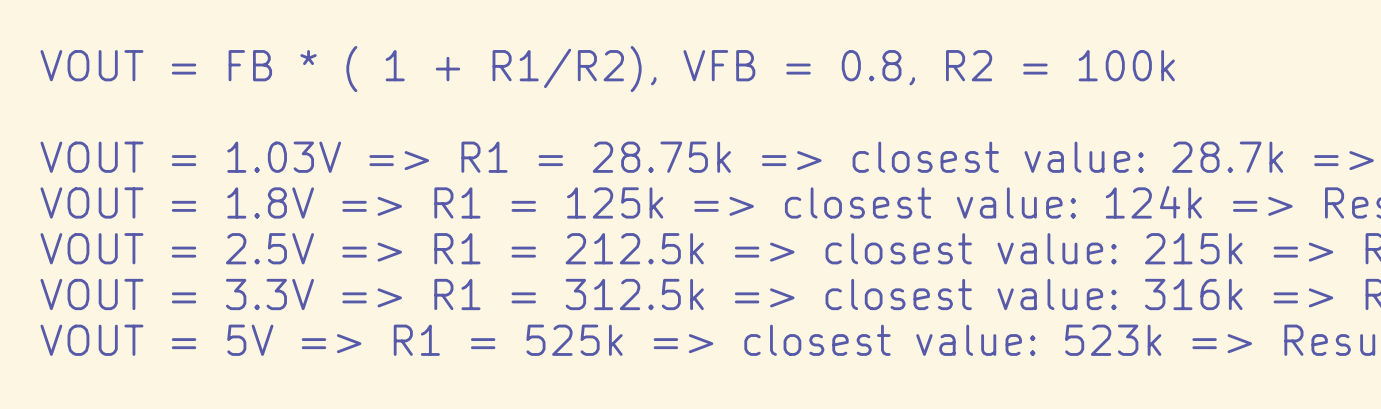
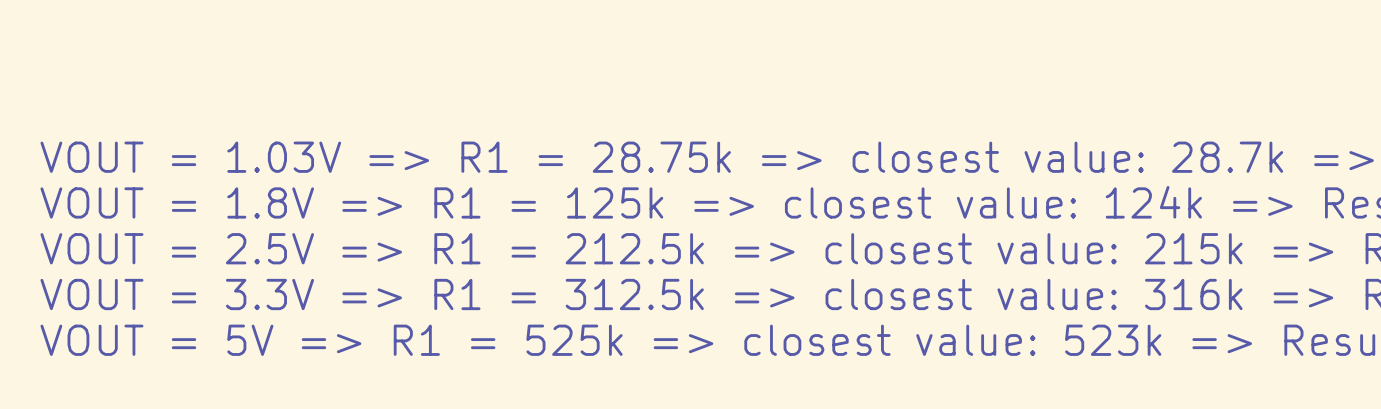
text: VOUT = FB * ( 1 + R1/R2), VFB = 0.8, R2 = 100k (607, 69) -> none

